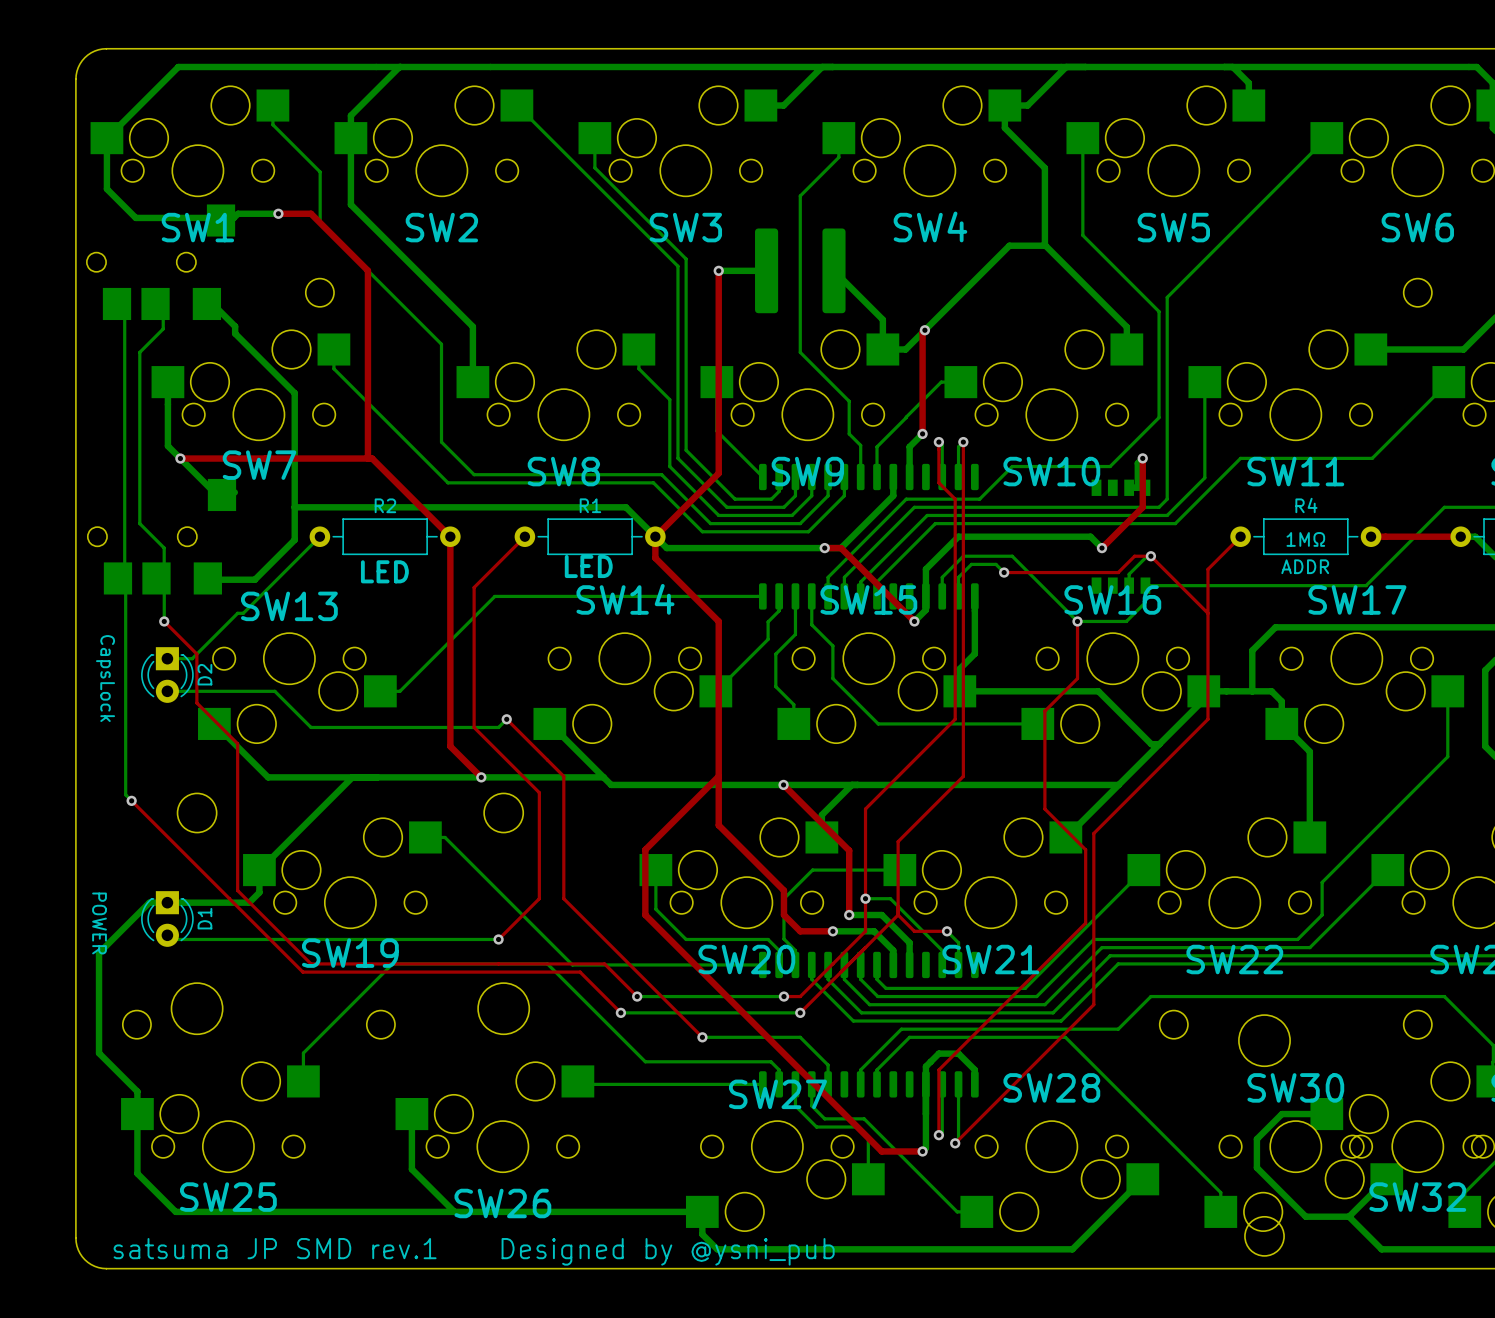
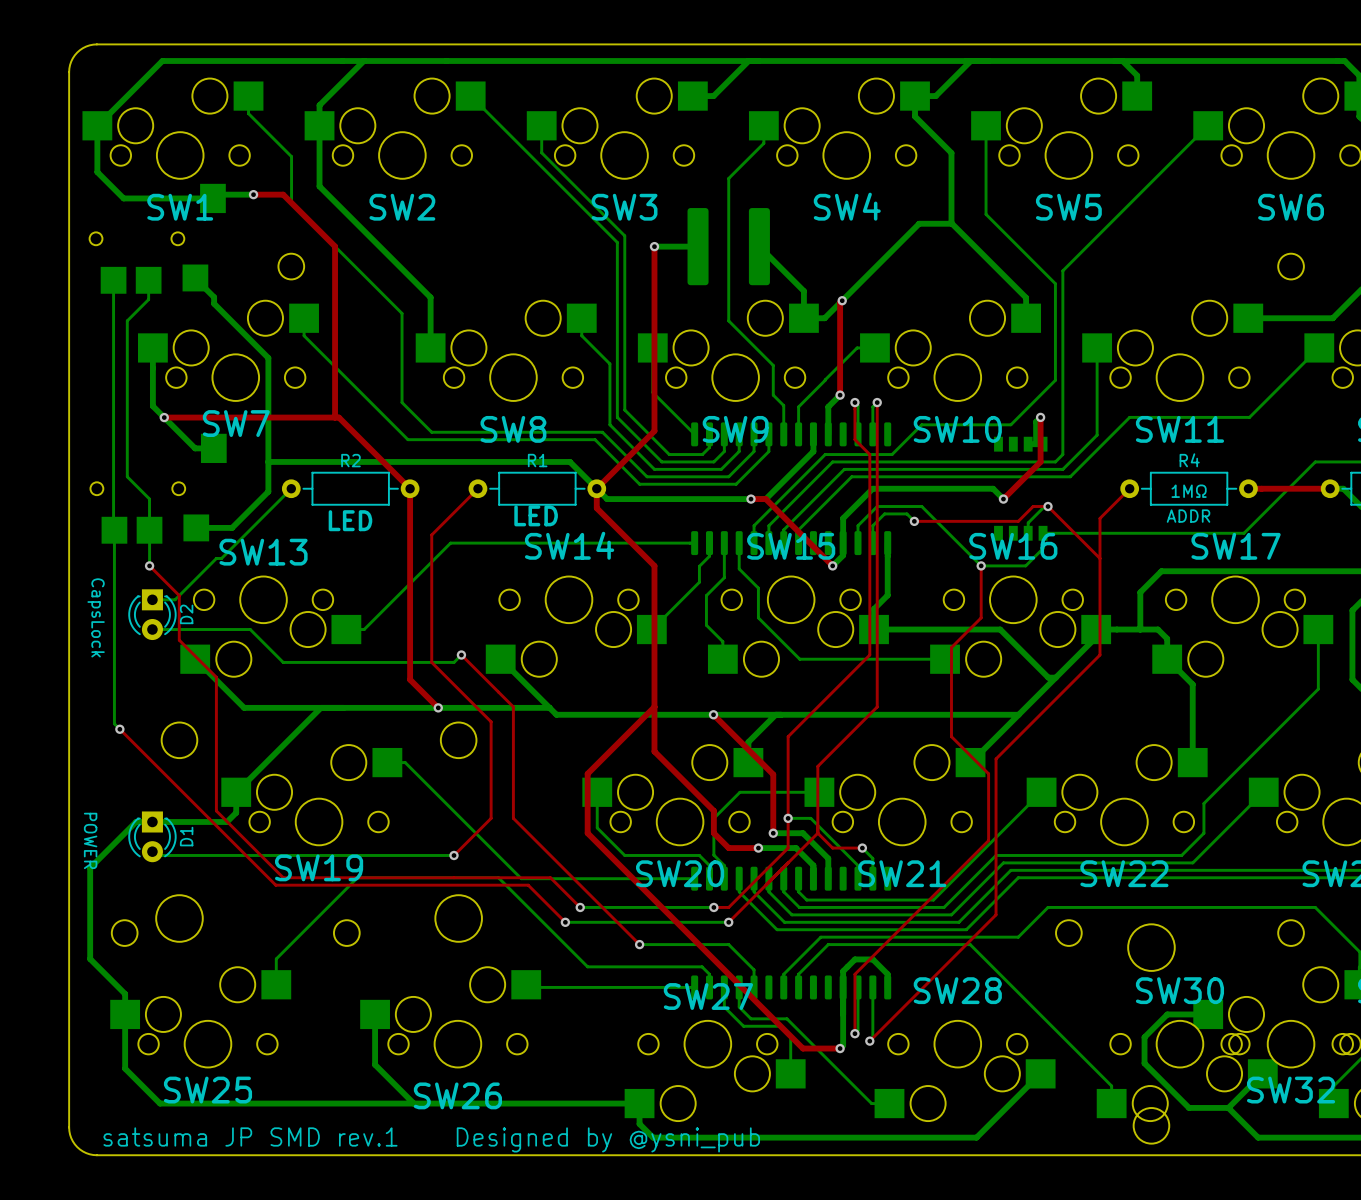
part footprint: [86, 204, 236, 321] -> [89, 183, 226, 294]
part footprint: [87, 478, 237, 595] -> [90, 433, 227, 544]

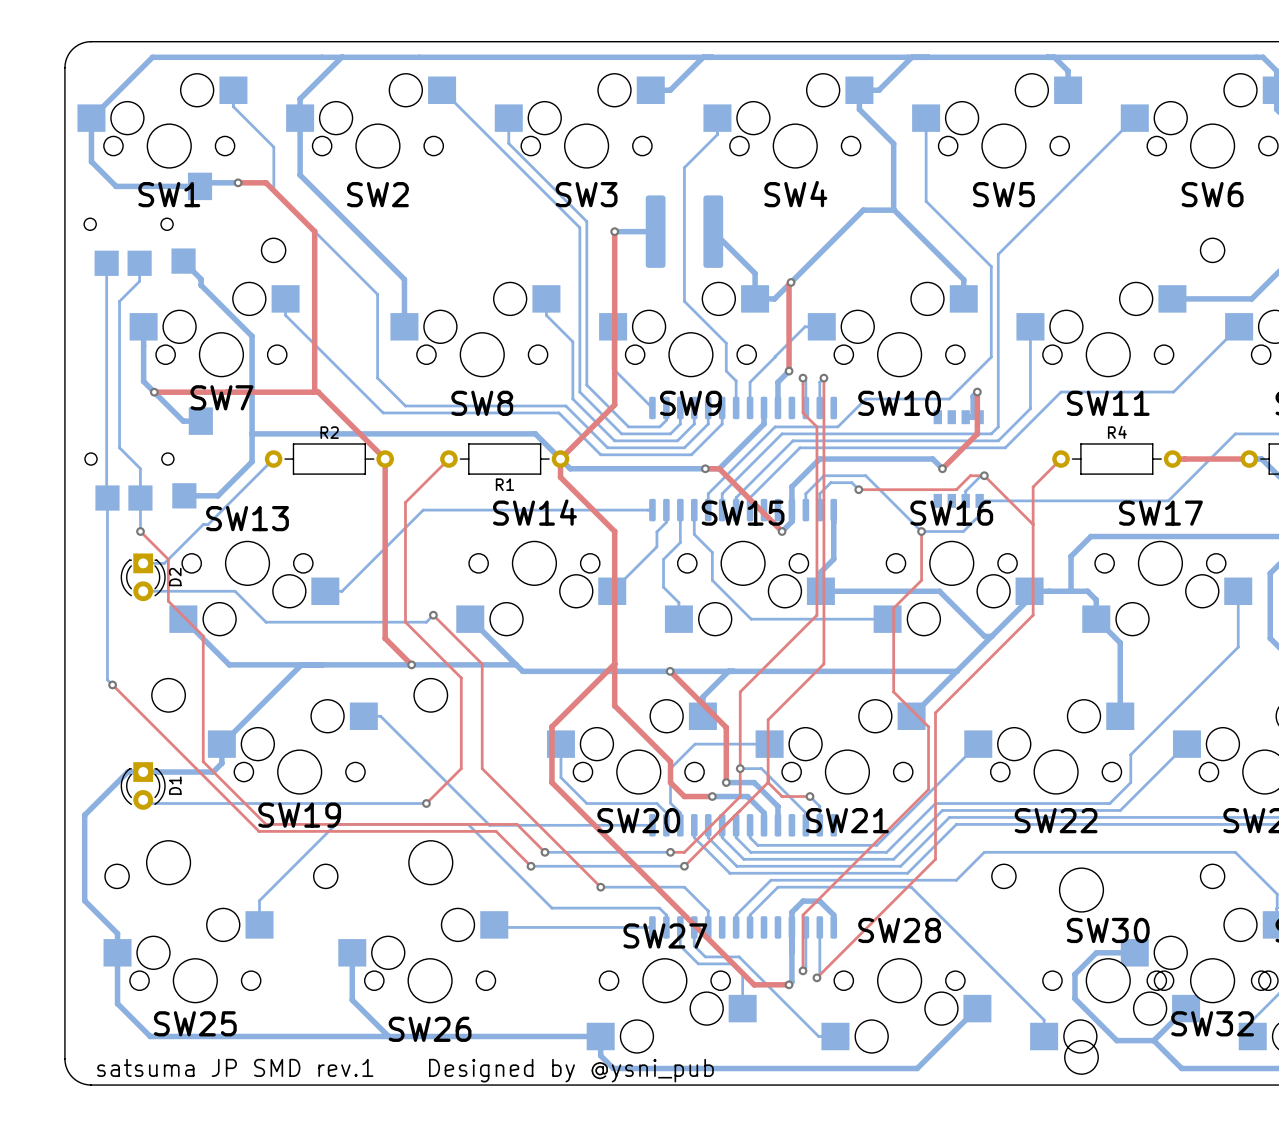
R1 name position: R1 (537, 460) -> R1 (504, 484)
text: 1MΩ (1189, 491) -> none
text: LED (536, 515) -> none
text: ADDR (1188, 516) -> none
text: LED (350, 520) -> none
text: CapsLock (96, 617) -> none
text: POWER (90, 840) -> none

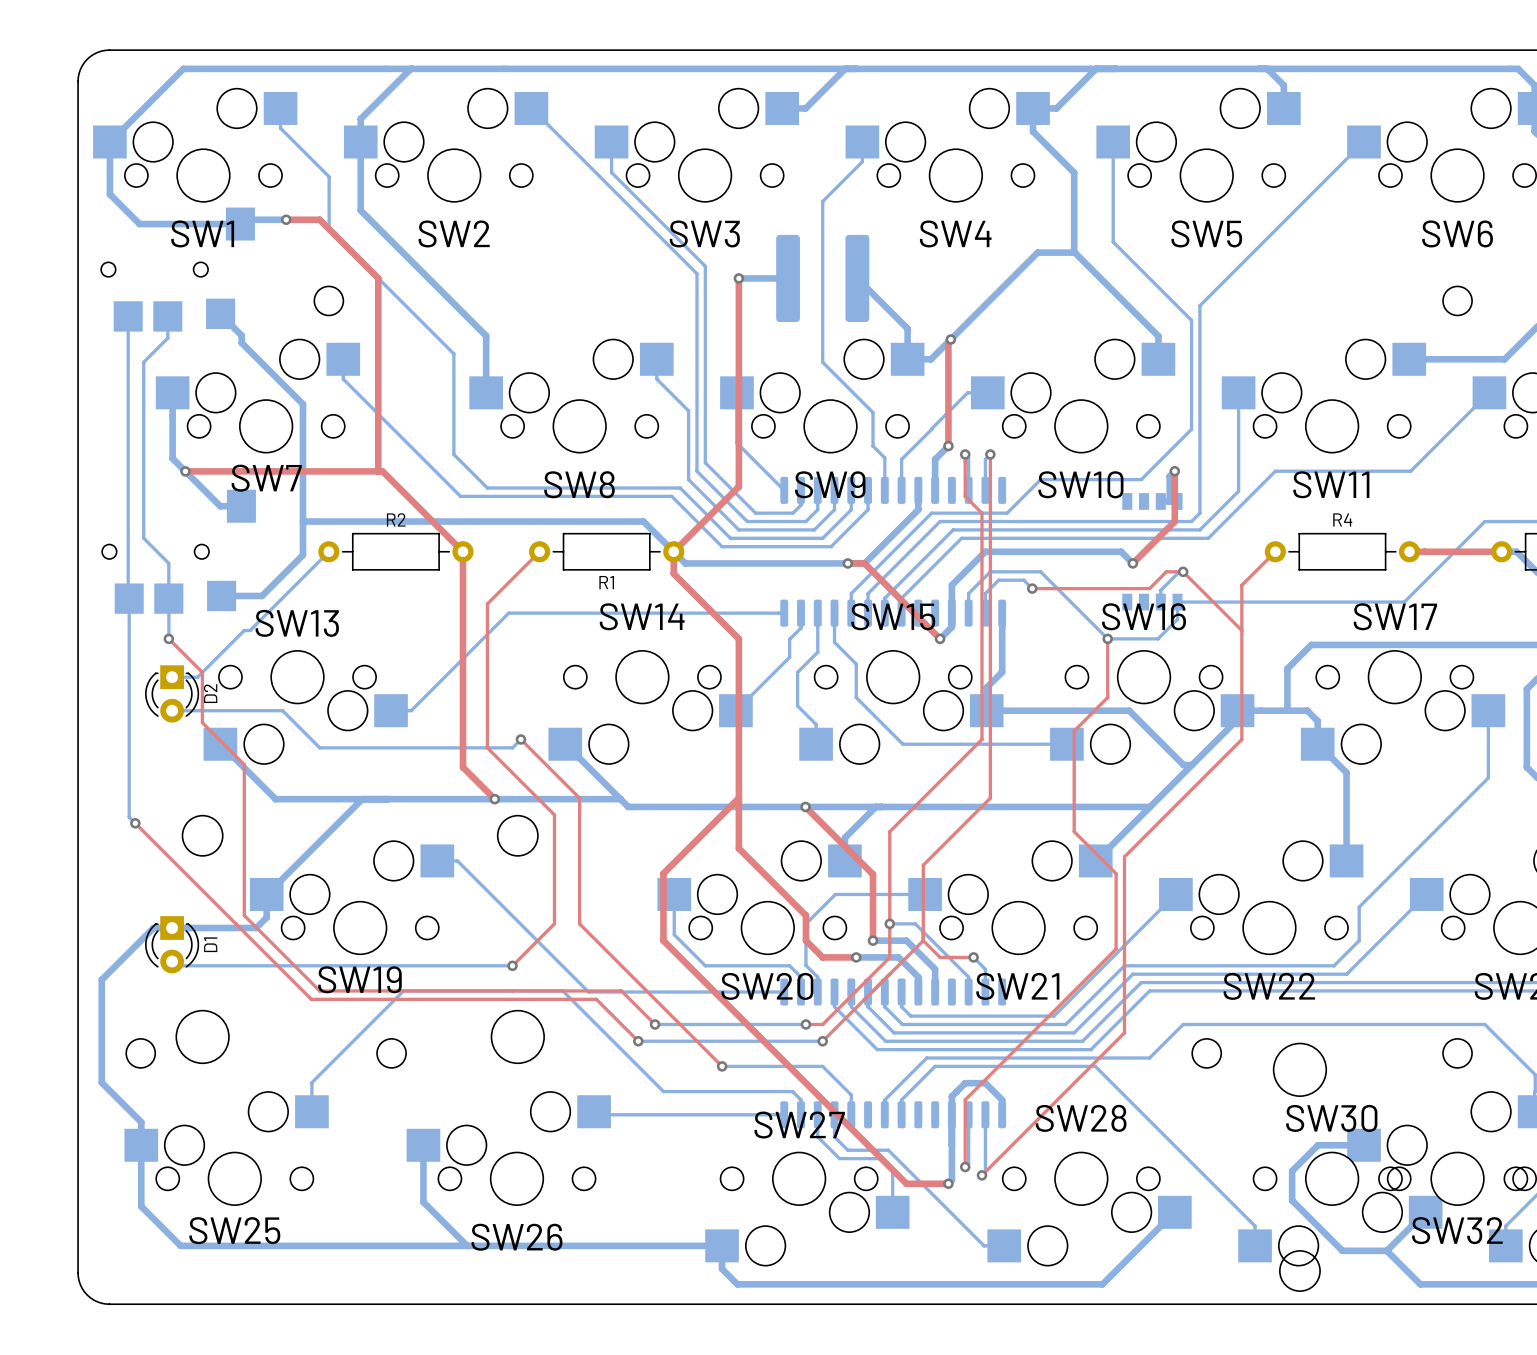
text: satsuma JP SMD rev.1 Designed by @ysni_pub (405, 1070) -> none

